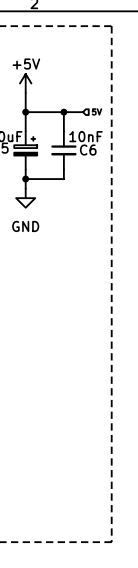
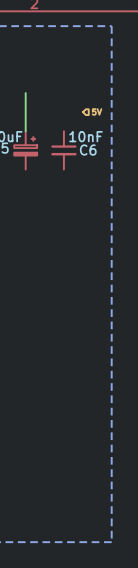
power symbol: +5V (25, 83) -> none
wire: (25, 112) (83, 112) -> none
junction: (25, 112) -> none
wire: (63, 112) (63, 131) -> none
junction: (63, 112) -> none
wire: (25, 169) (25, 188) -> none
wire: (63, 169) (63, 179) (25, 179) -> none
junction: (25, 179) -> none
power symbol: GND (25, 198) -> none

